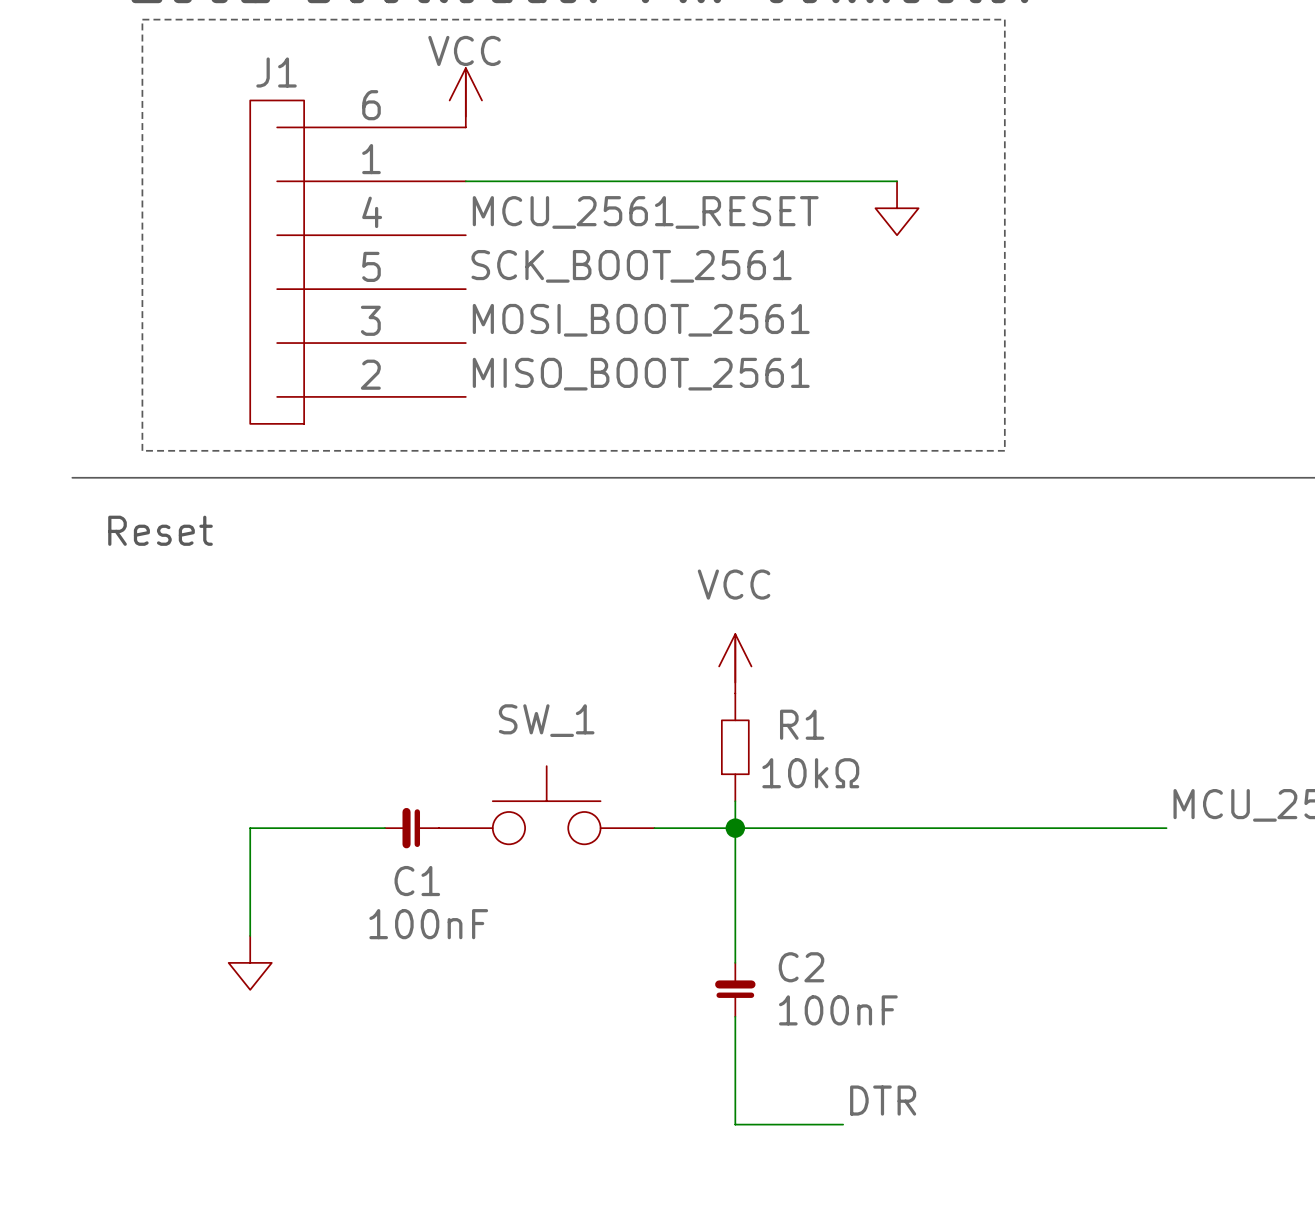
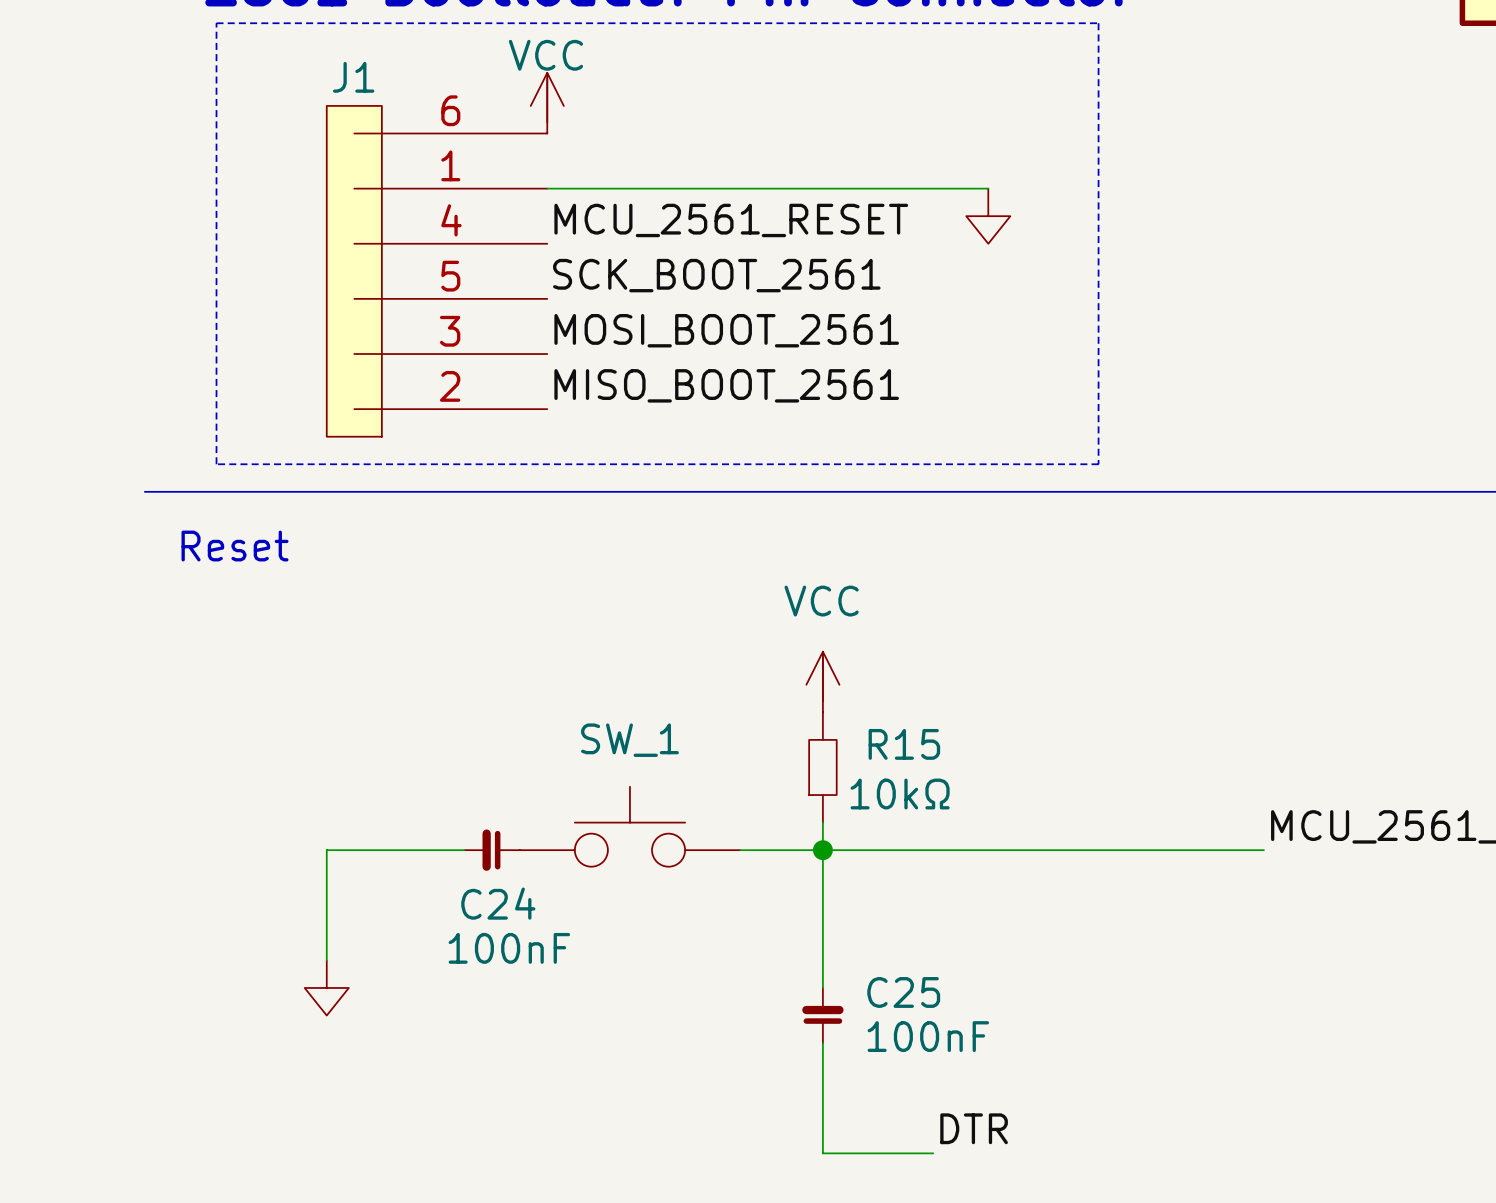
R1 name: R1 (802, 724) -> R15 (904, 744)
C1 name: C1 (417, 881) -> C24 (498, 903)
C2 name: C2 (801, 967) -> C25 (903, 992)

